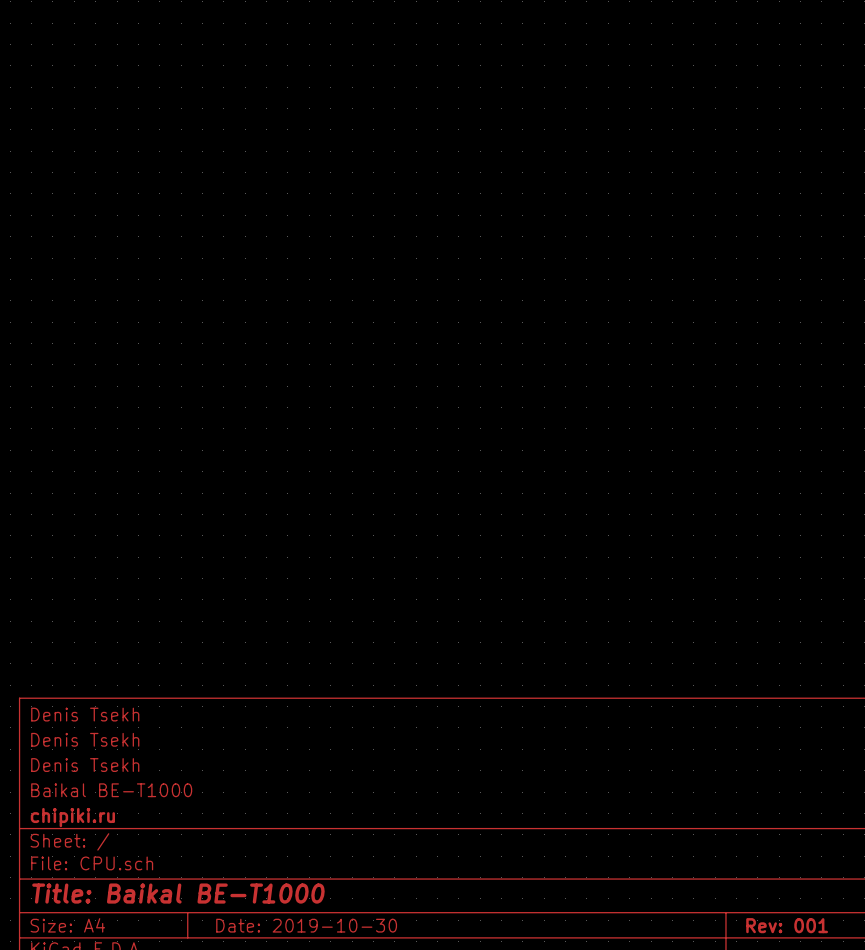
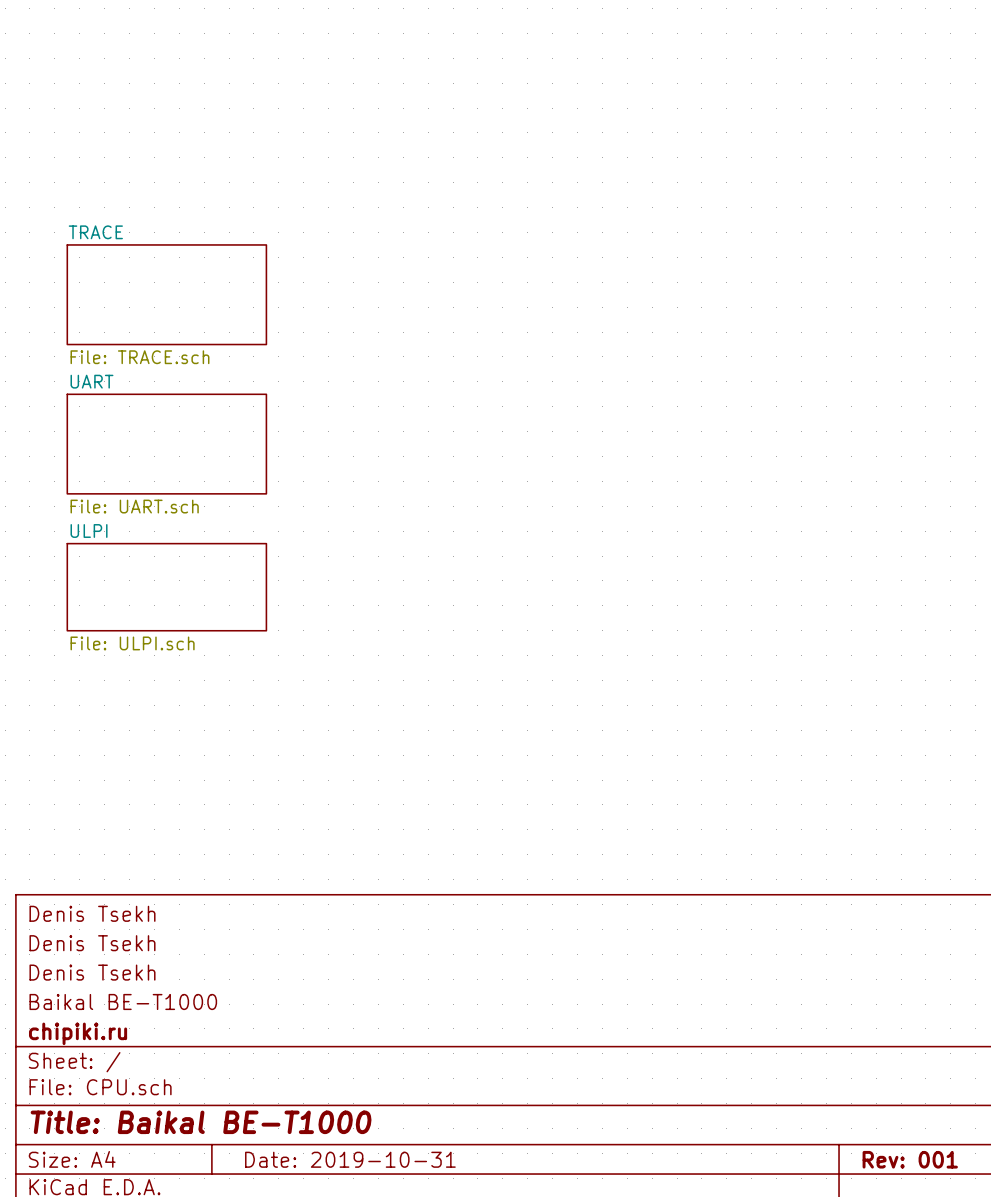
sheet TRACE: none -> File: TRACE.sch (166, 294)
sheet UART: none -> File: UART.sch (166, 444)
sheet ULPI: none -> File: ULPI.sch (166, 587)
title block: Date: 2019-10-30 (306, 925) -> Date: 2019-10-31 (350, 1159)

